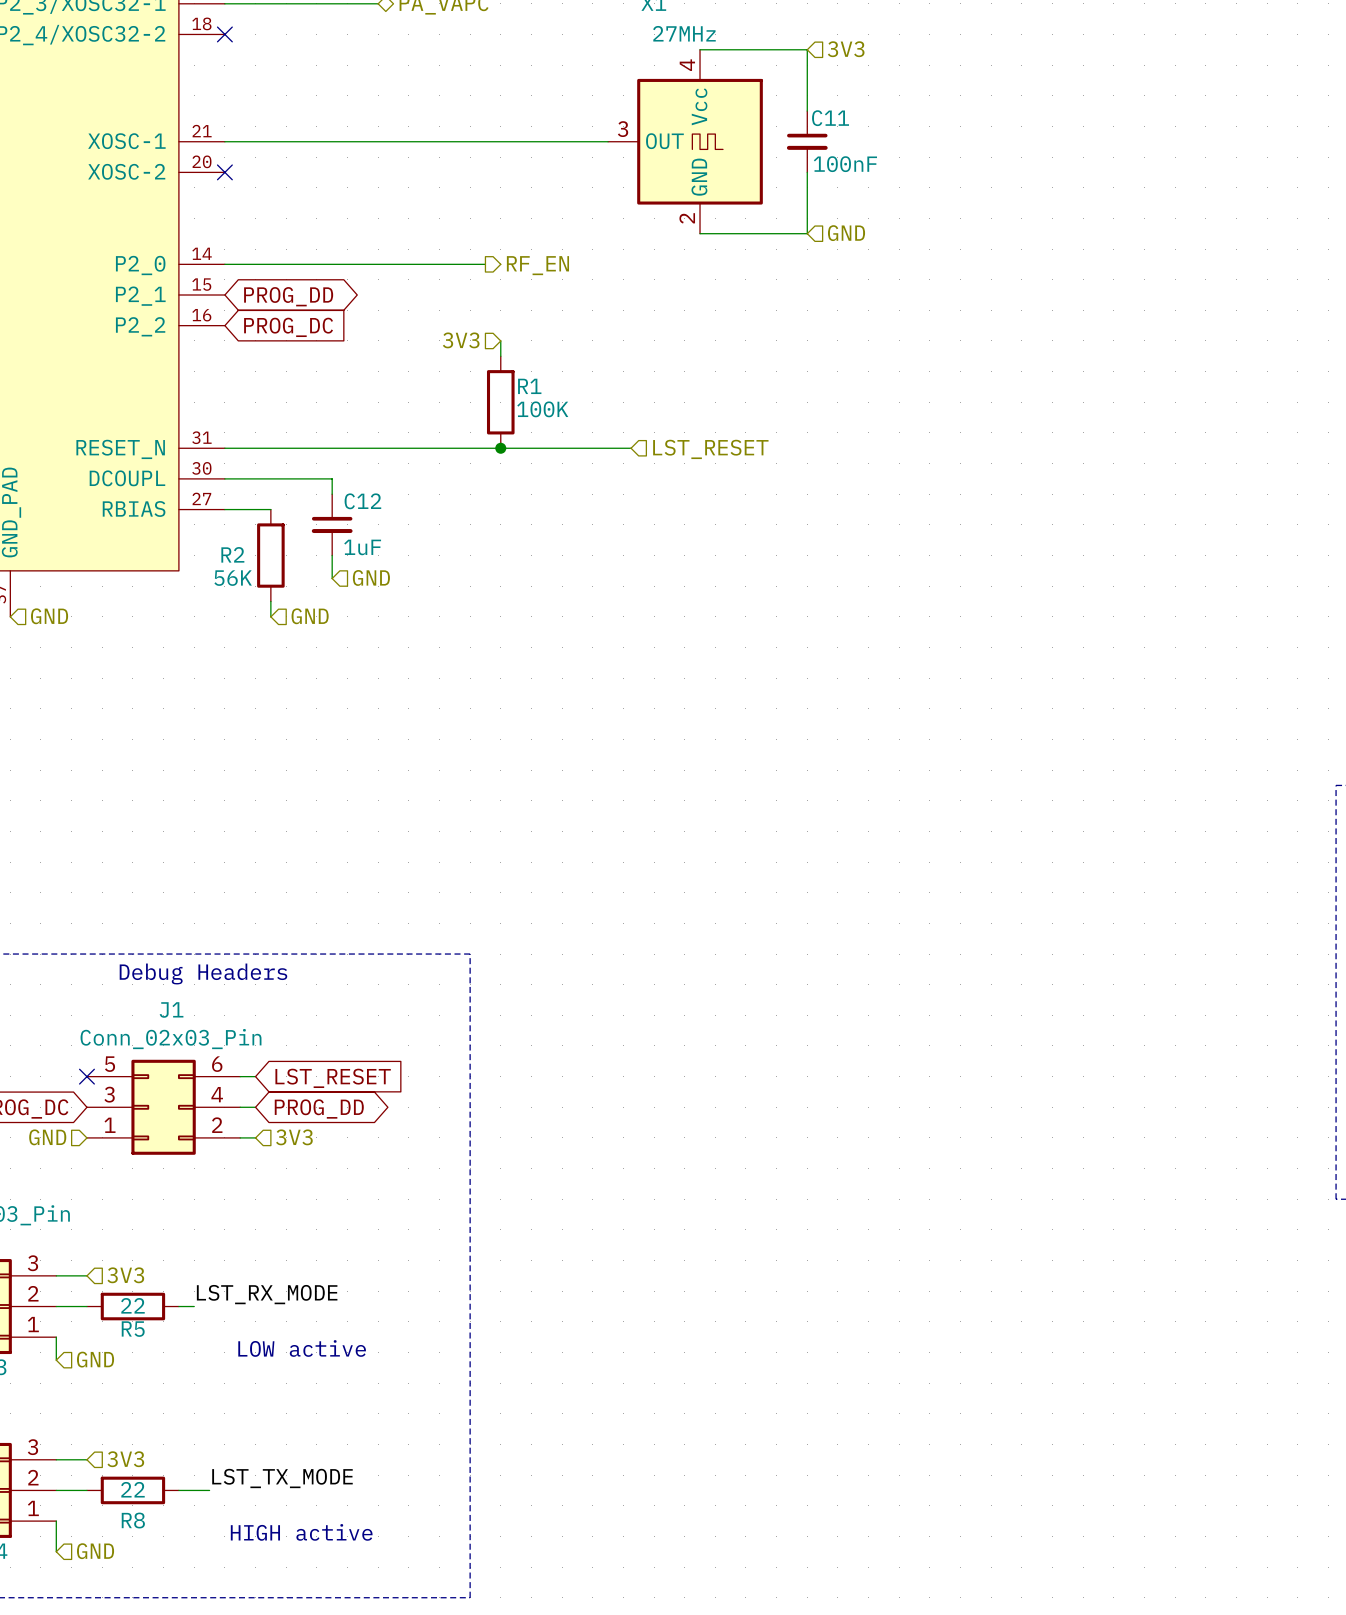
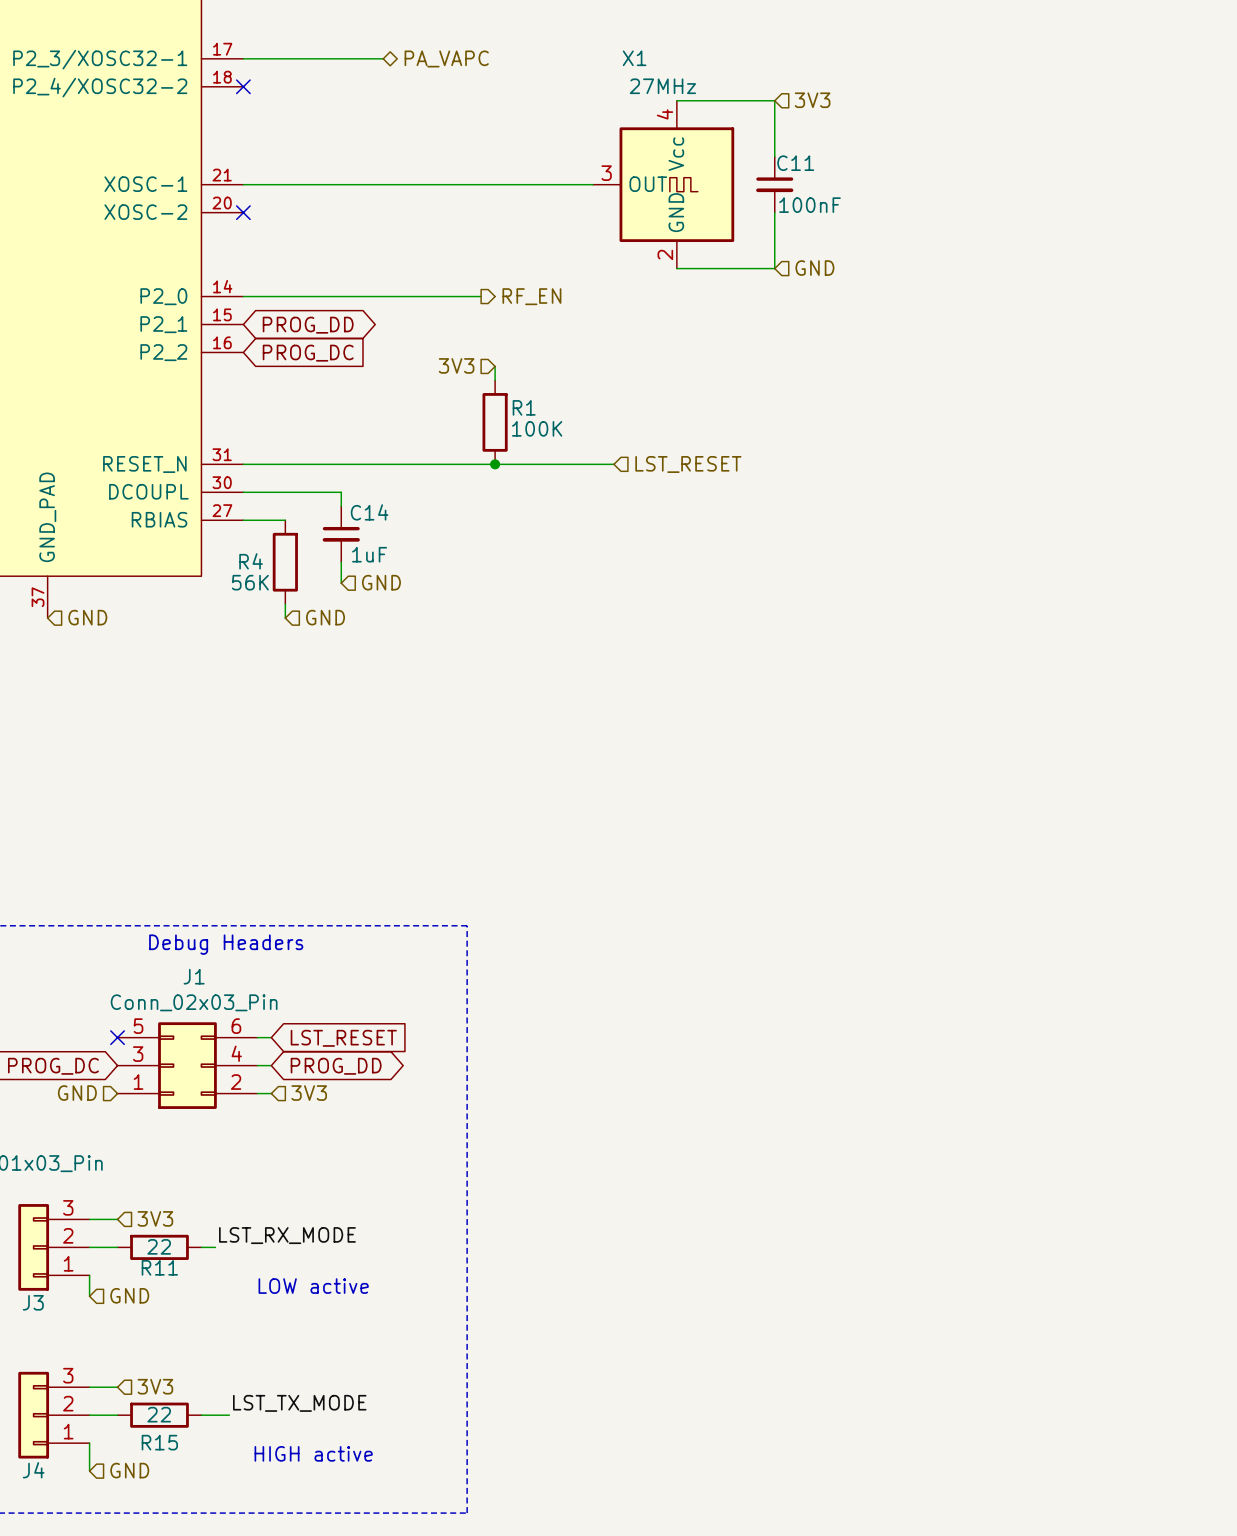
C12 name: C12 (362, 501) -> C14 (369, 512)
R2 name: R2 (232, 554) -> R4 (251, 561)
R5 name: R5 (133, 1329) -> R11 (159, 1267)
R8 name: R8 (133, 1520) -> R15 (159, 1442)

